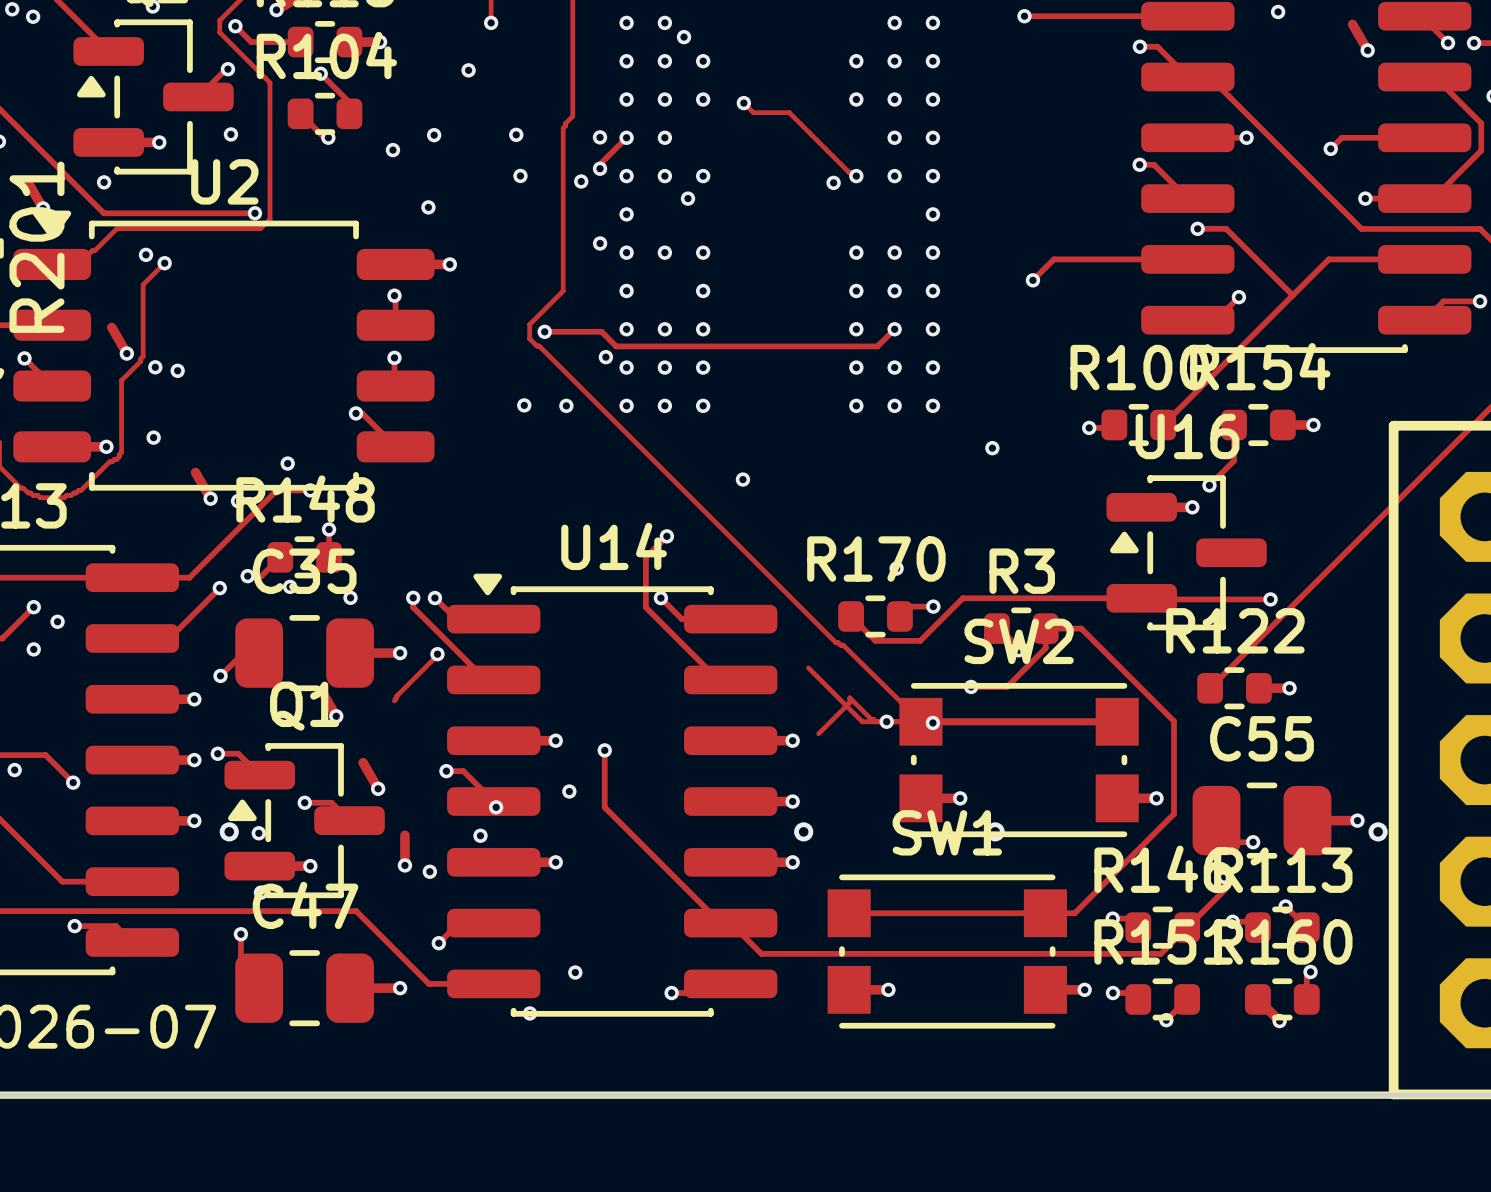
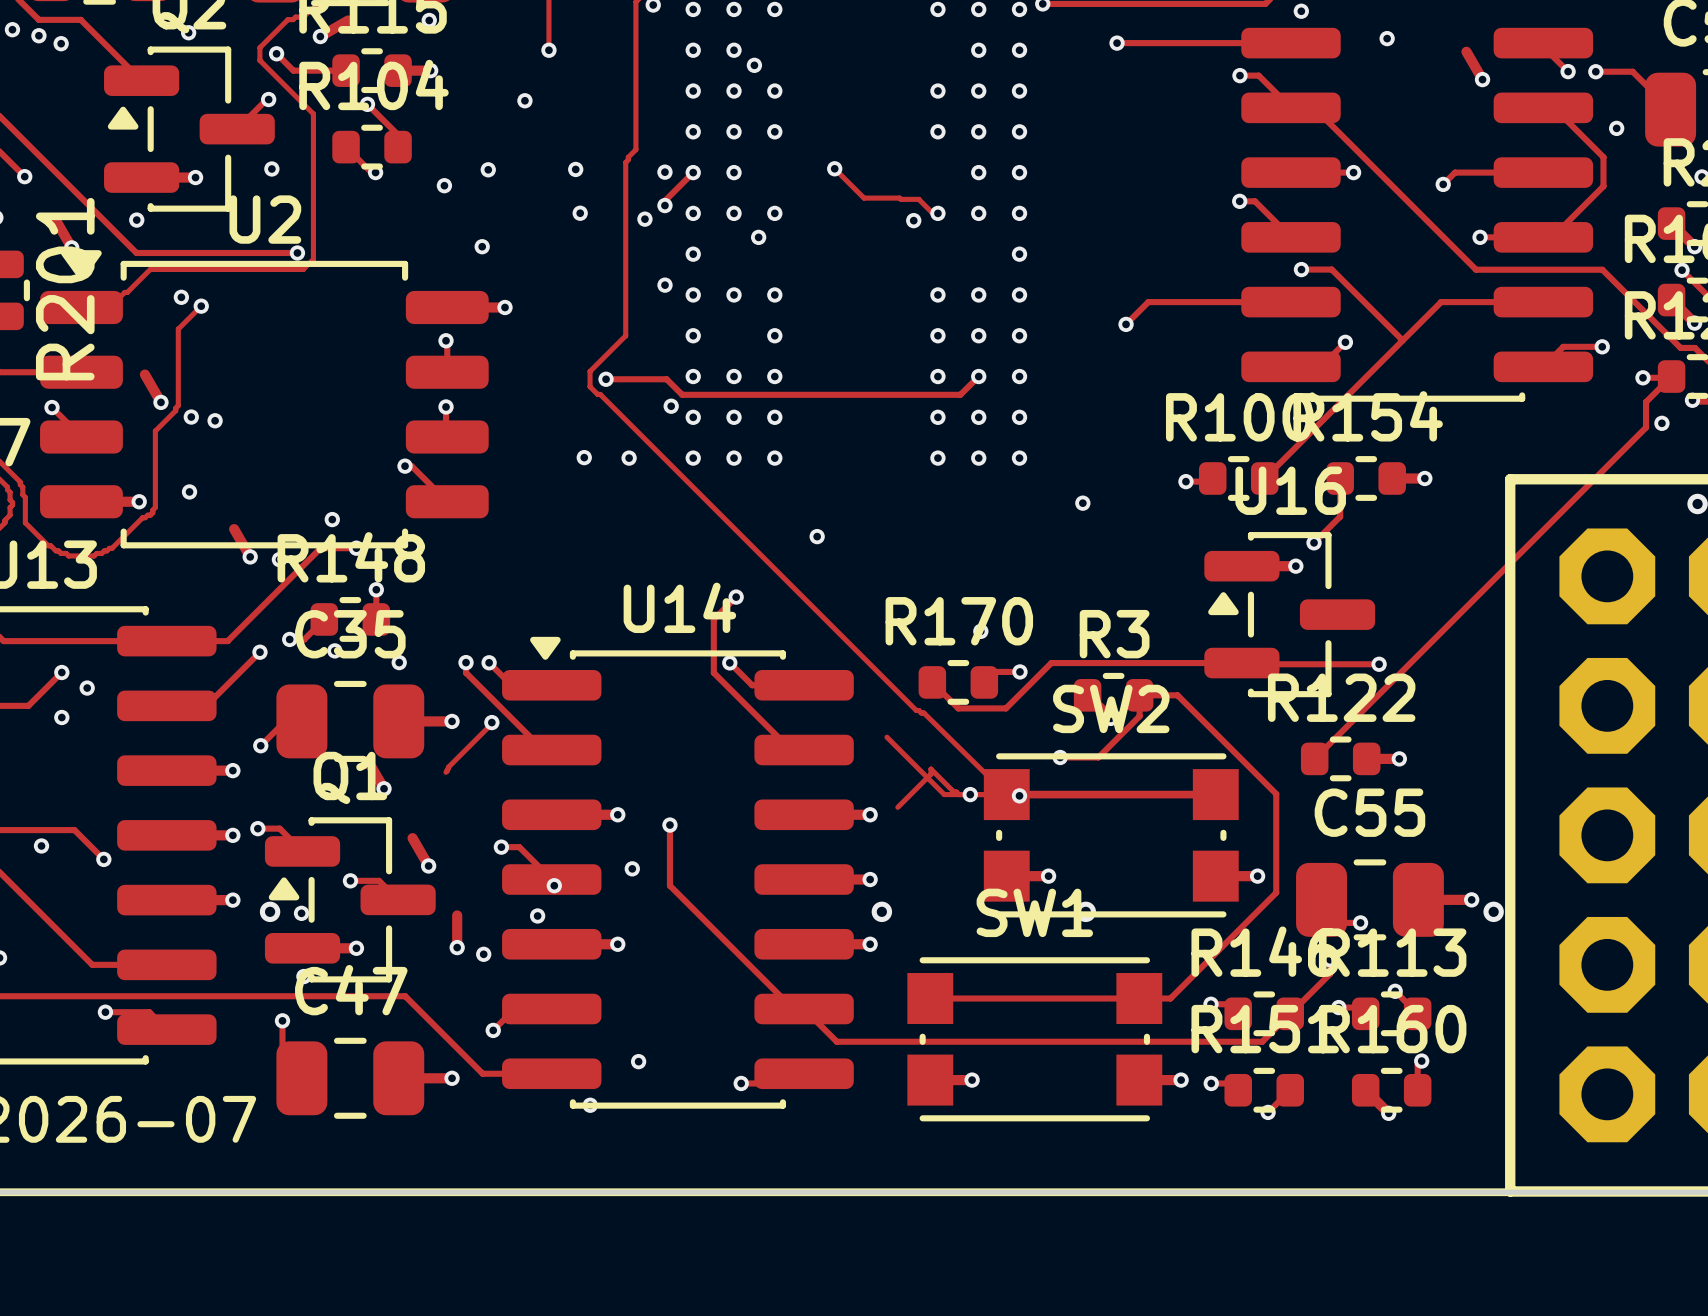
track: (743, 103) (753, 112) (789, 112) (849, 172) (853, 174) -> (834, 168) (864, 198) (918, 199) (931, 212) (935, 212)
via position: (743, 103) -> (834, 168)

